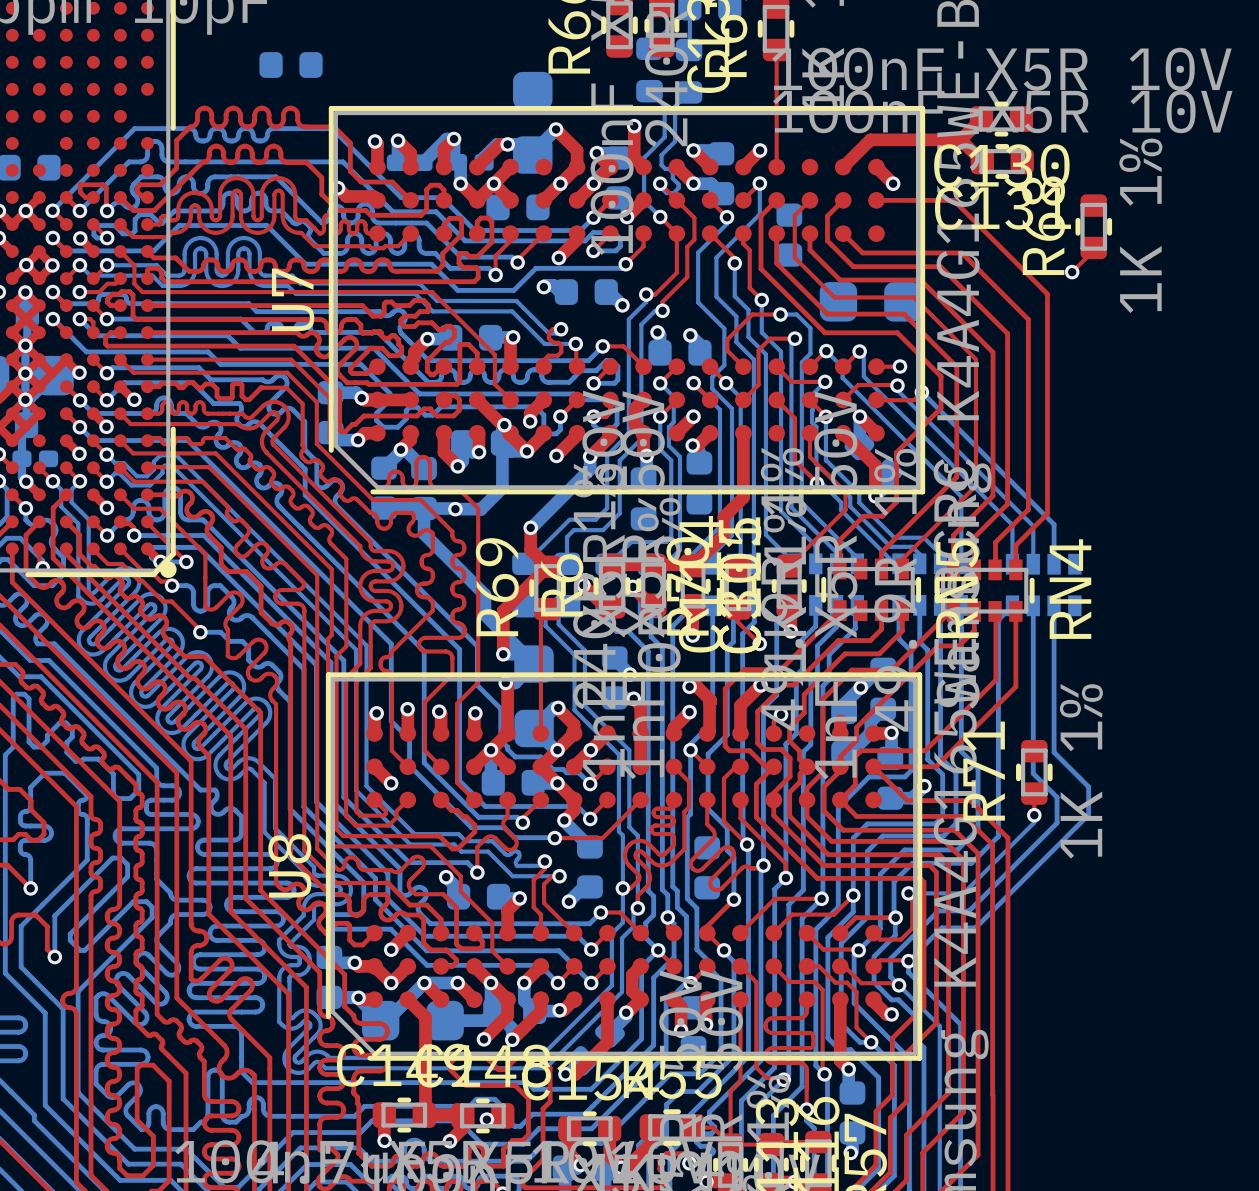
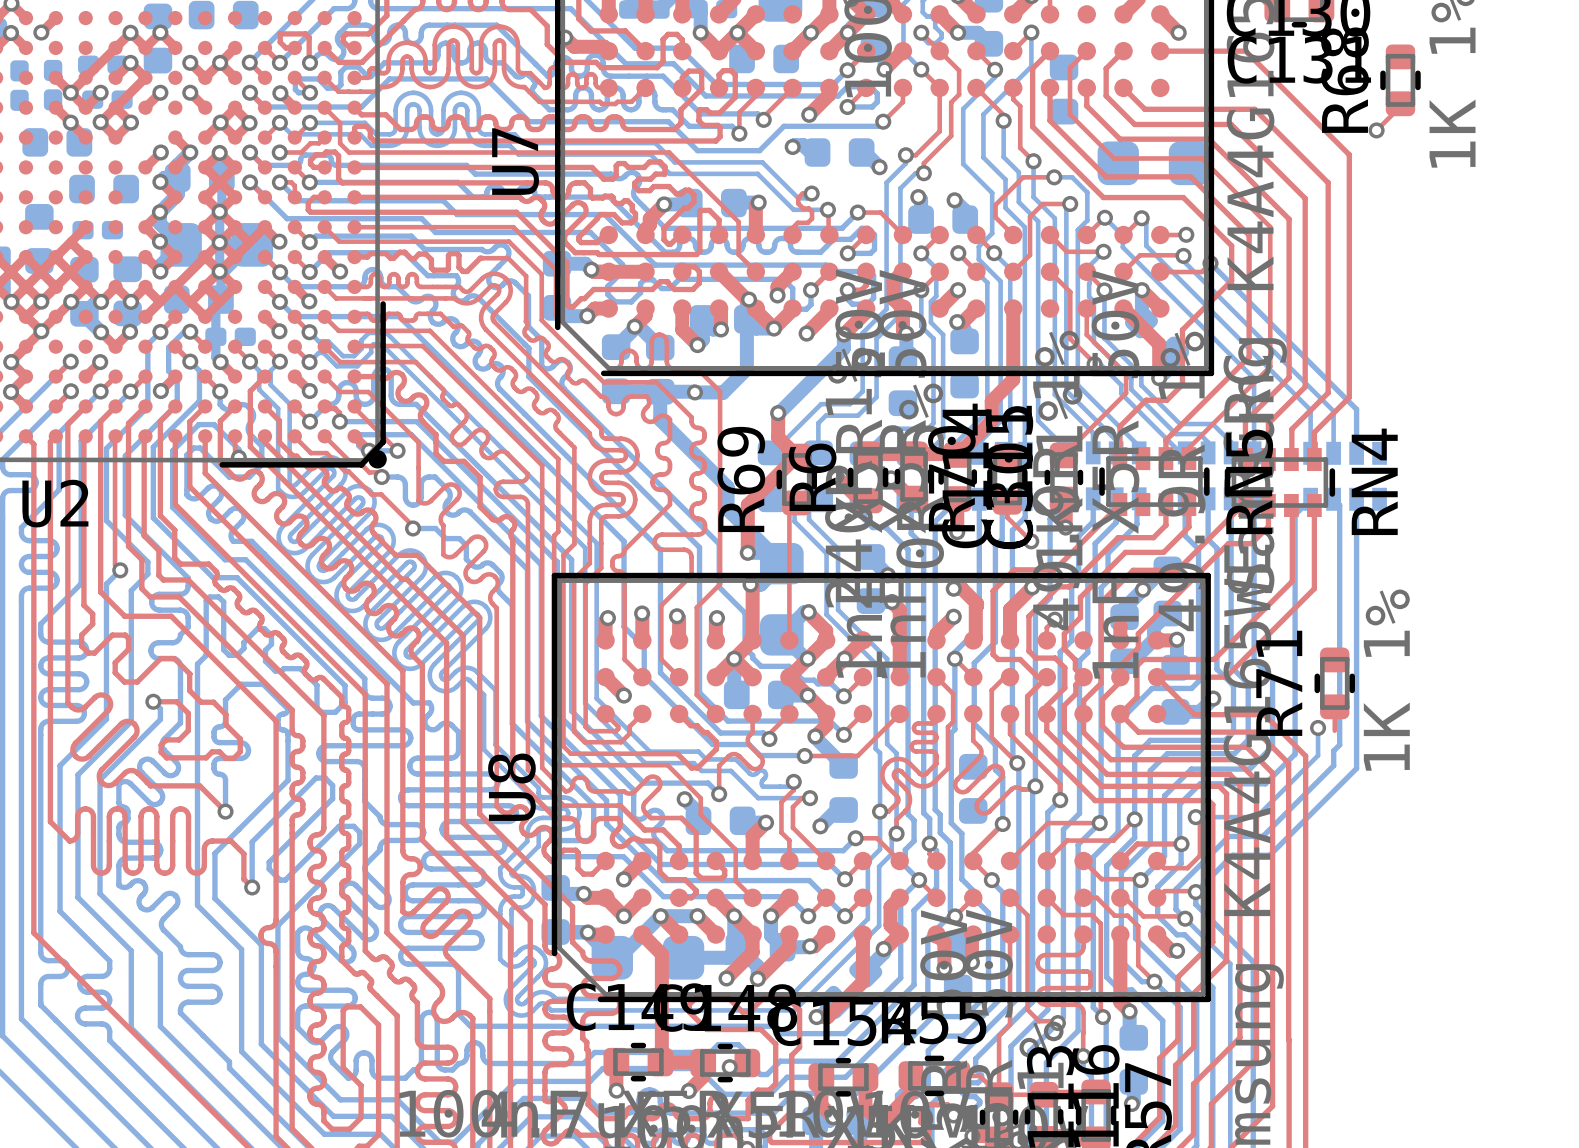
bottom track: (1033, 605) (1033, 773) (1057, 797) (1057, 823) (1033, 846) -> (1333, 499) (1339, 505) (1339, 744) (1333, 750) (1333, 765)
bottom track: (1054, 752) (1088, 786) (1088, 814) (1054, 849) -> (1356, 661) (1356, 768)
bottom track: (1034, 815) (1034, 822) (1019, 837) -> (1318, 727) (1318, 755)
via position: (1034, 815) -> (1318, 727)

